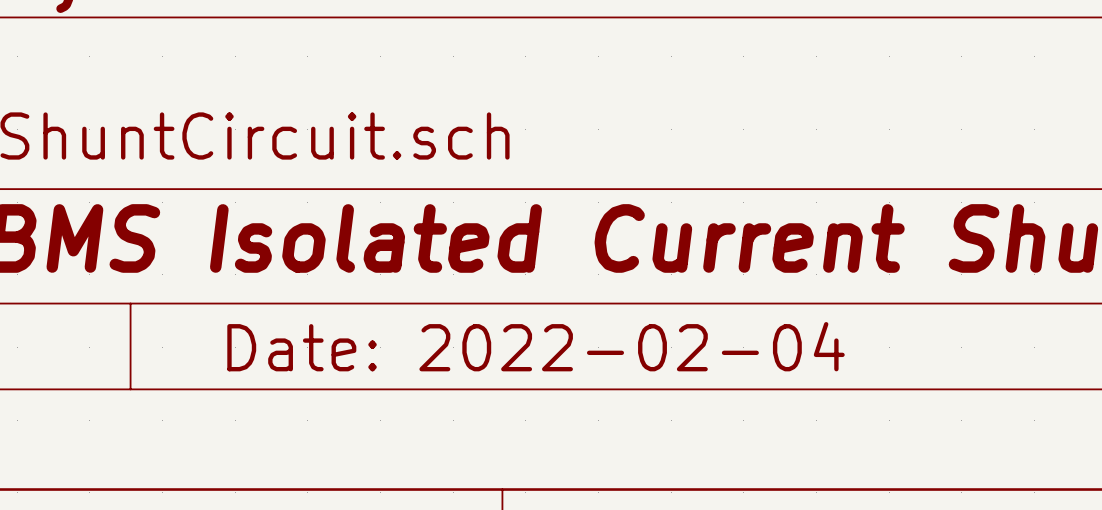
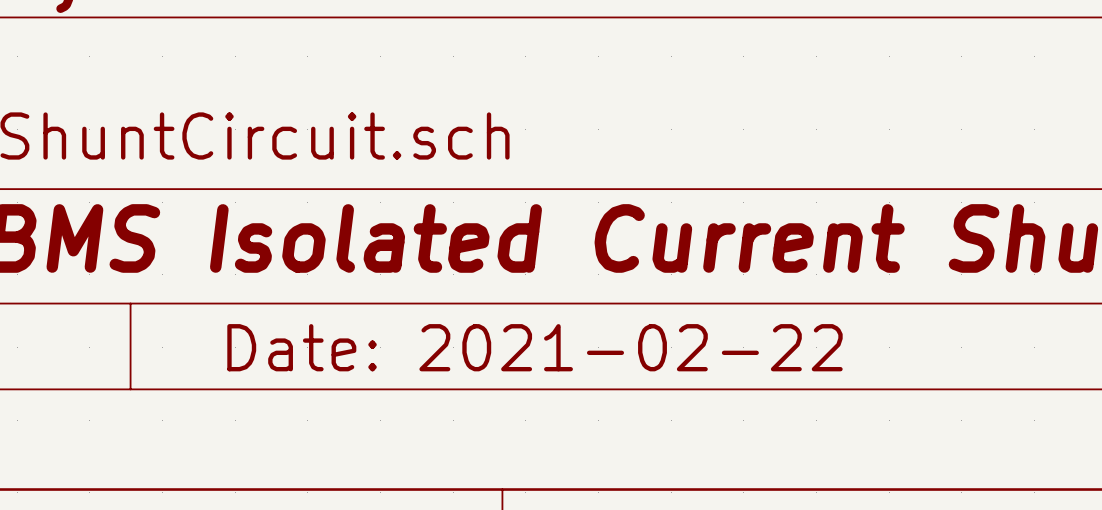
title block: Date: 2022-02-04 (536, 346) -> Date: 2021-02-22 (534, 347)

